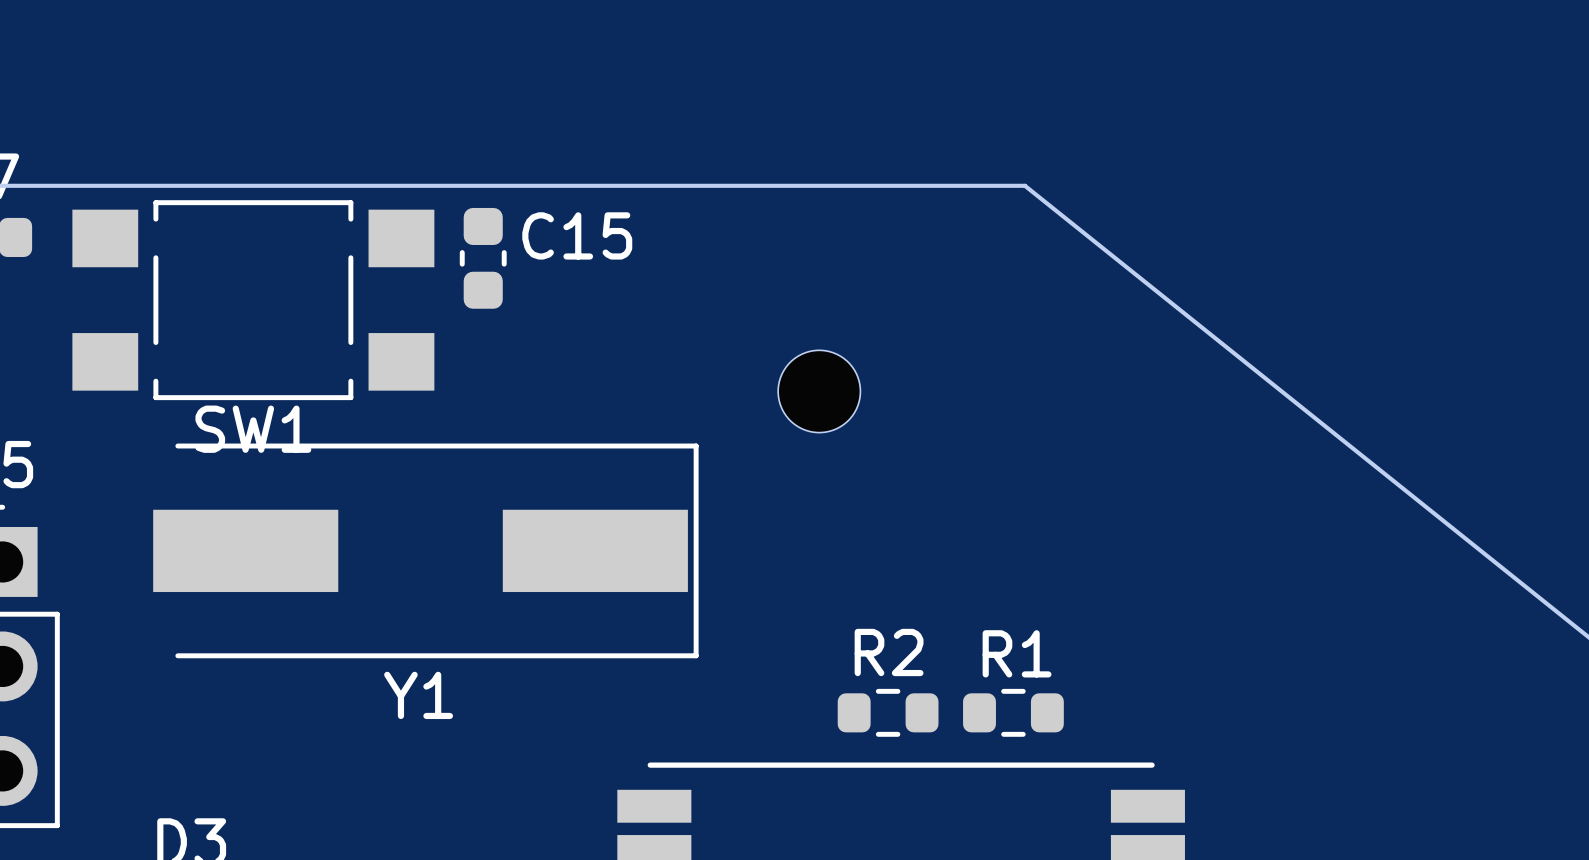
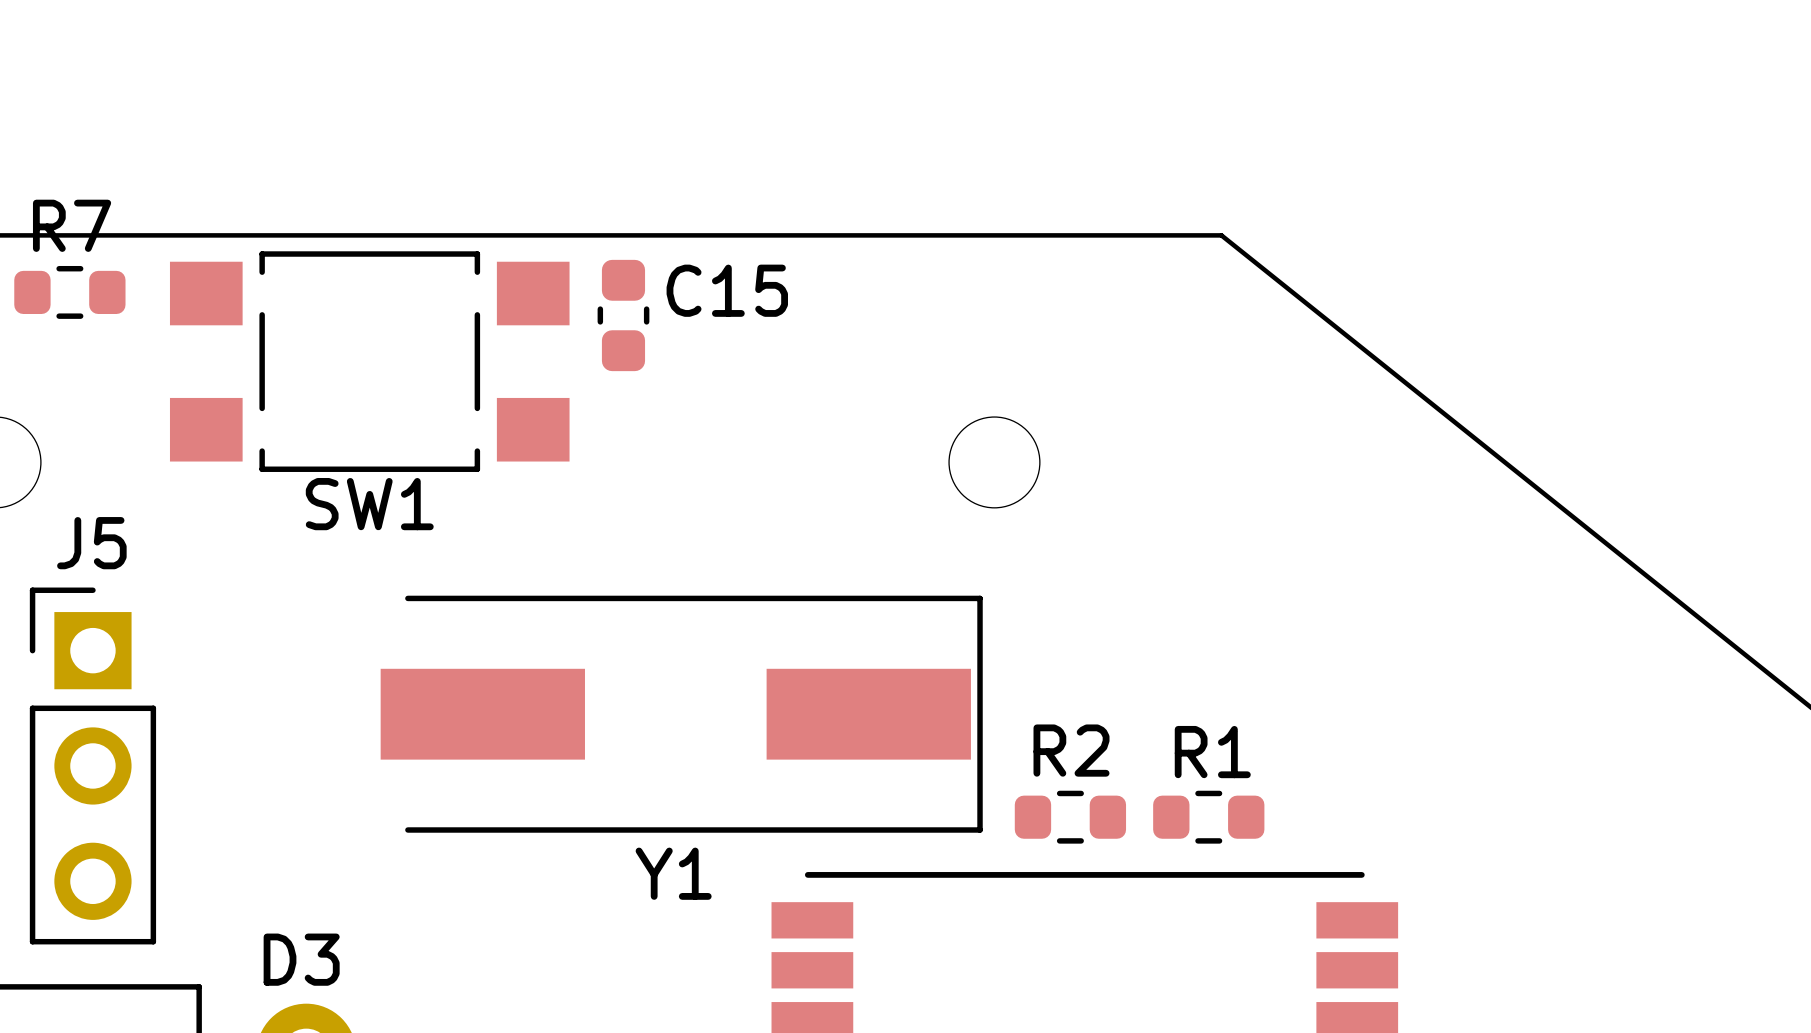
Y1 position: (425, 550) -> (681, 714)

